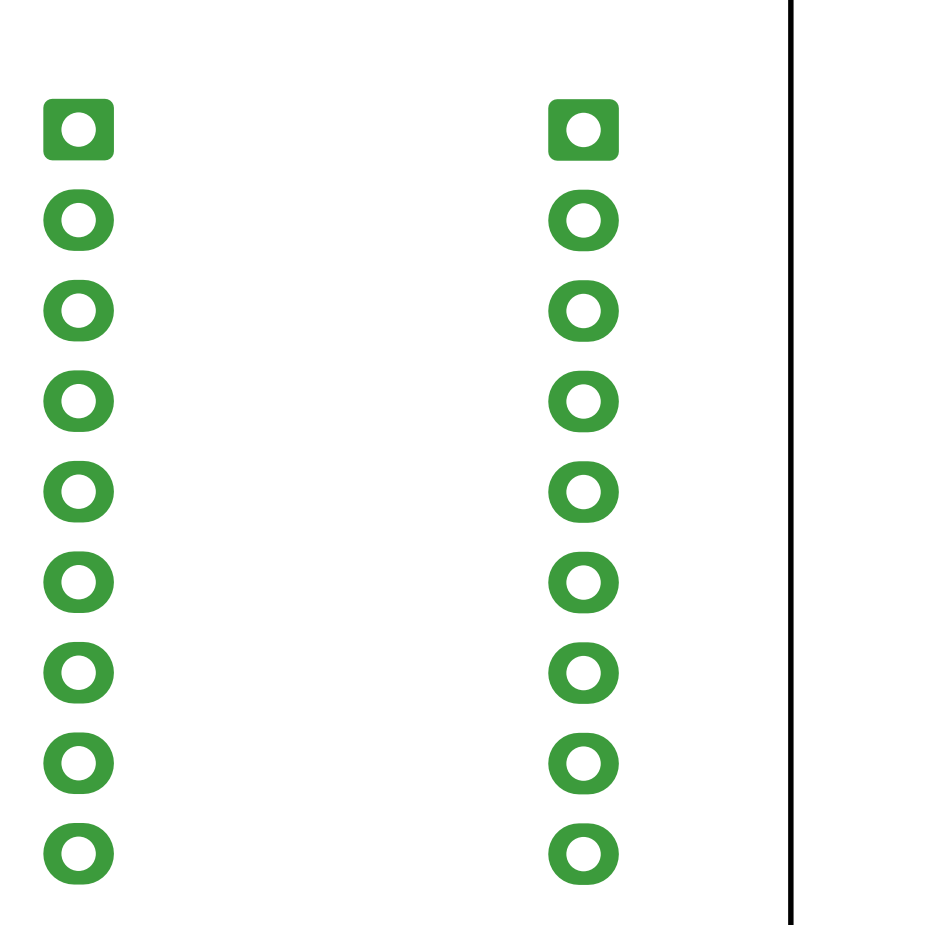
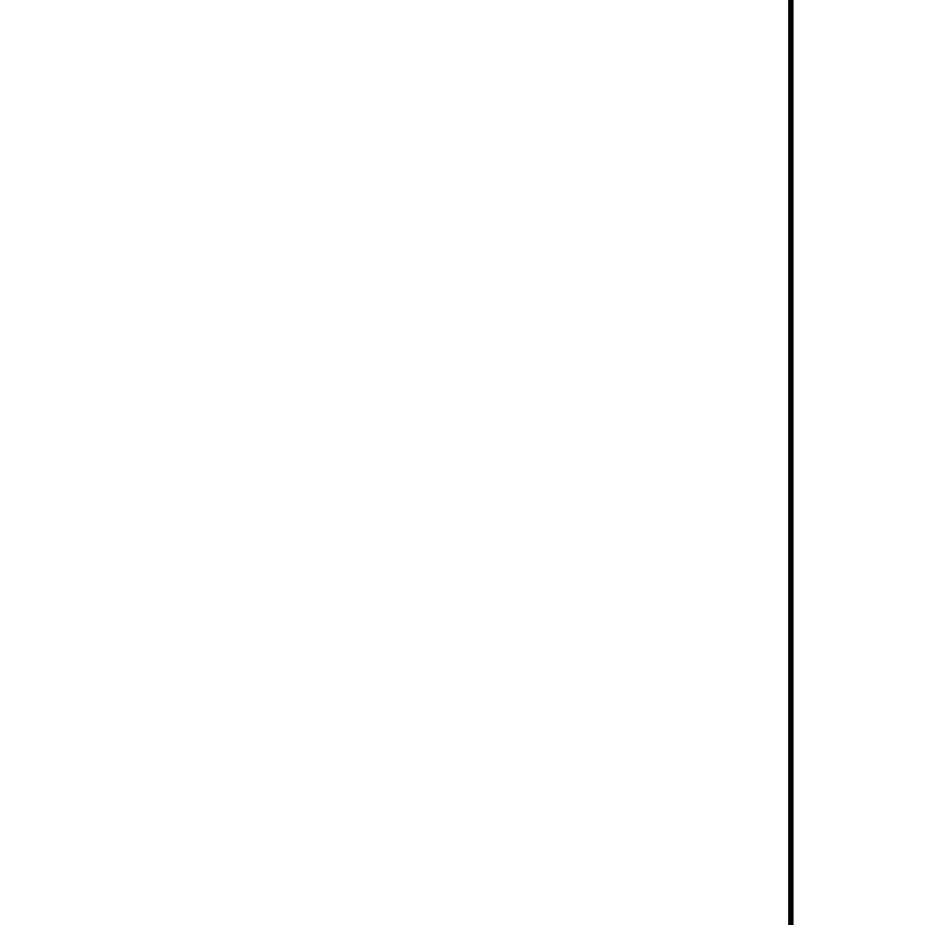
part: (78, 491) -> none
part: (583, 492) -> none

